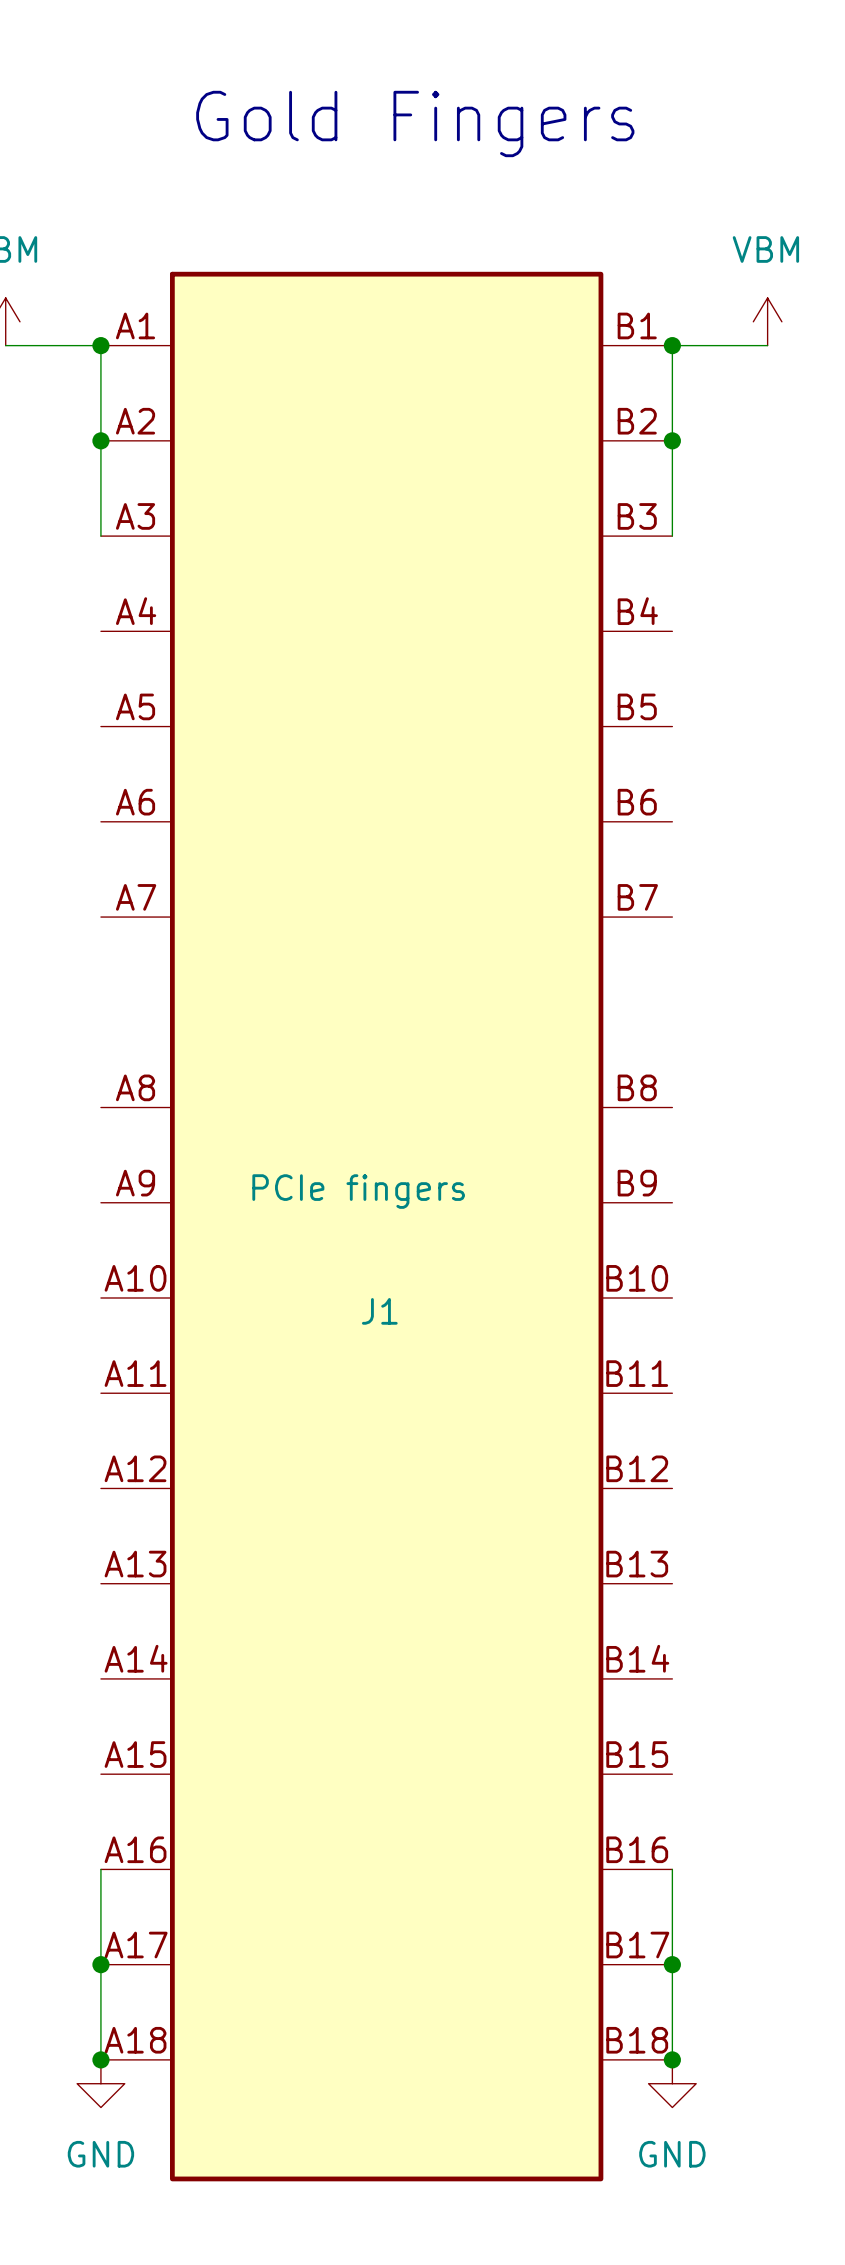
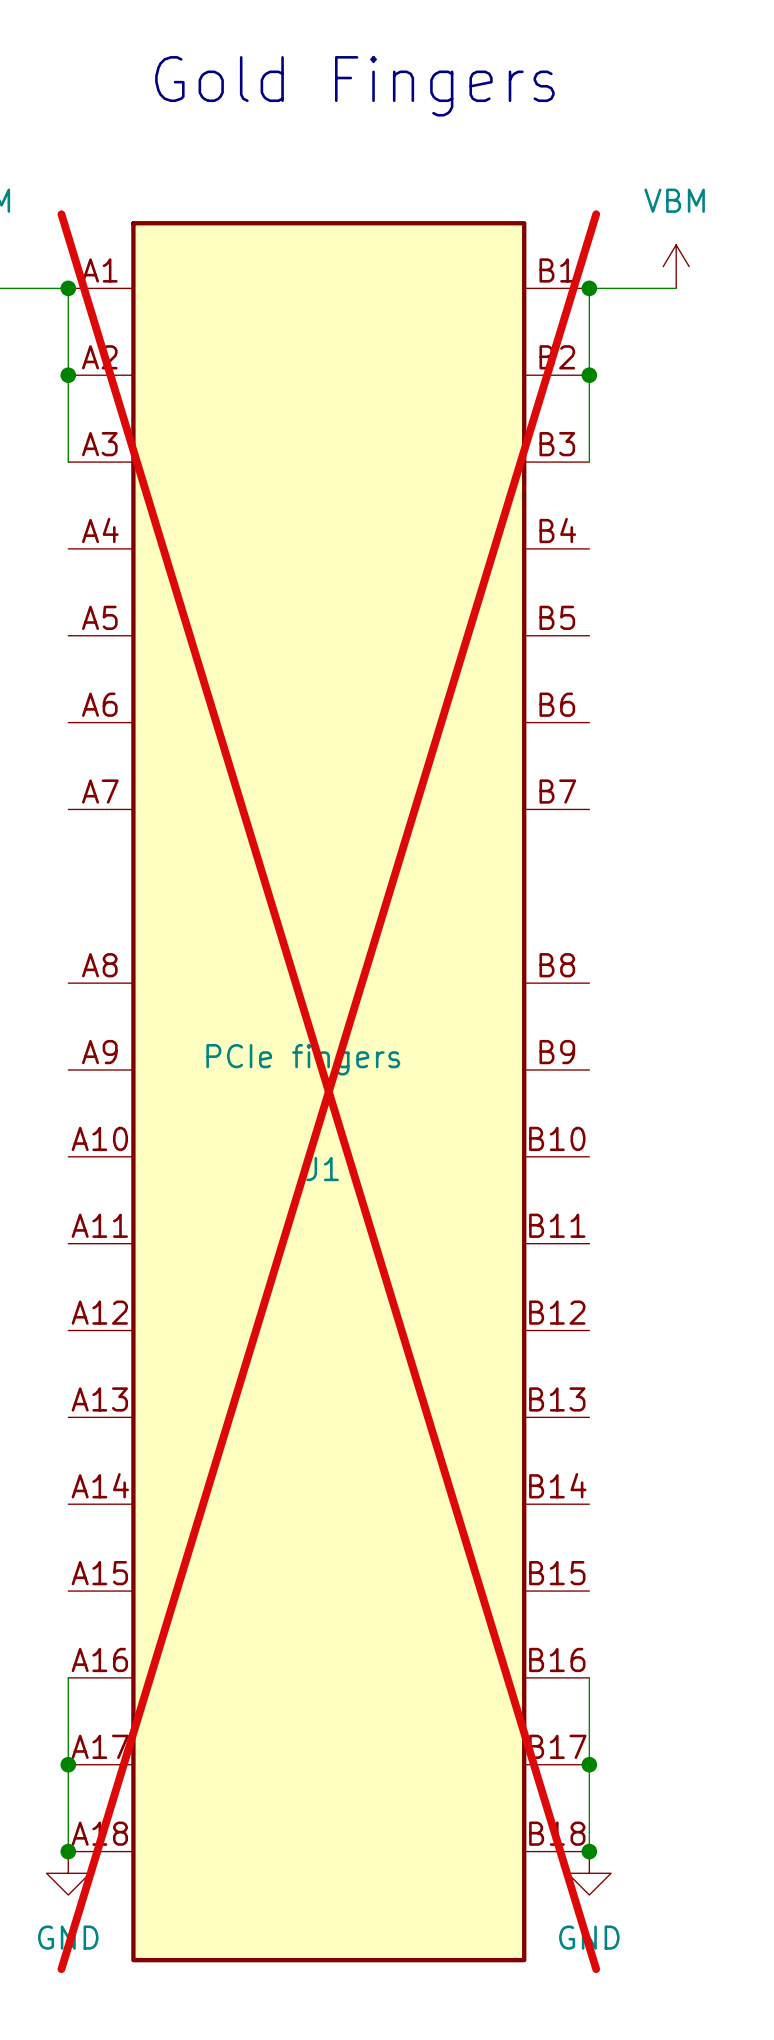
J1 do-not-place cross: none -> (328, 1091)

